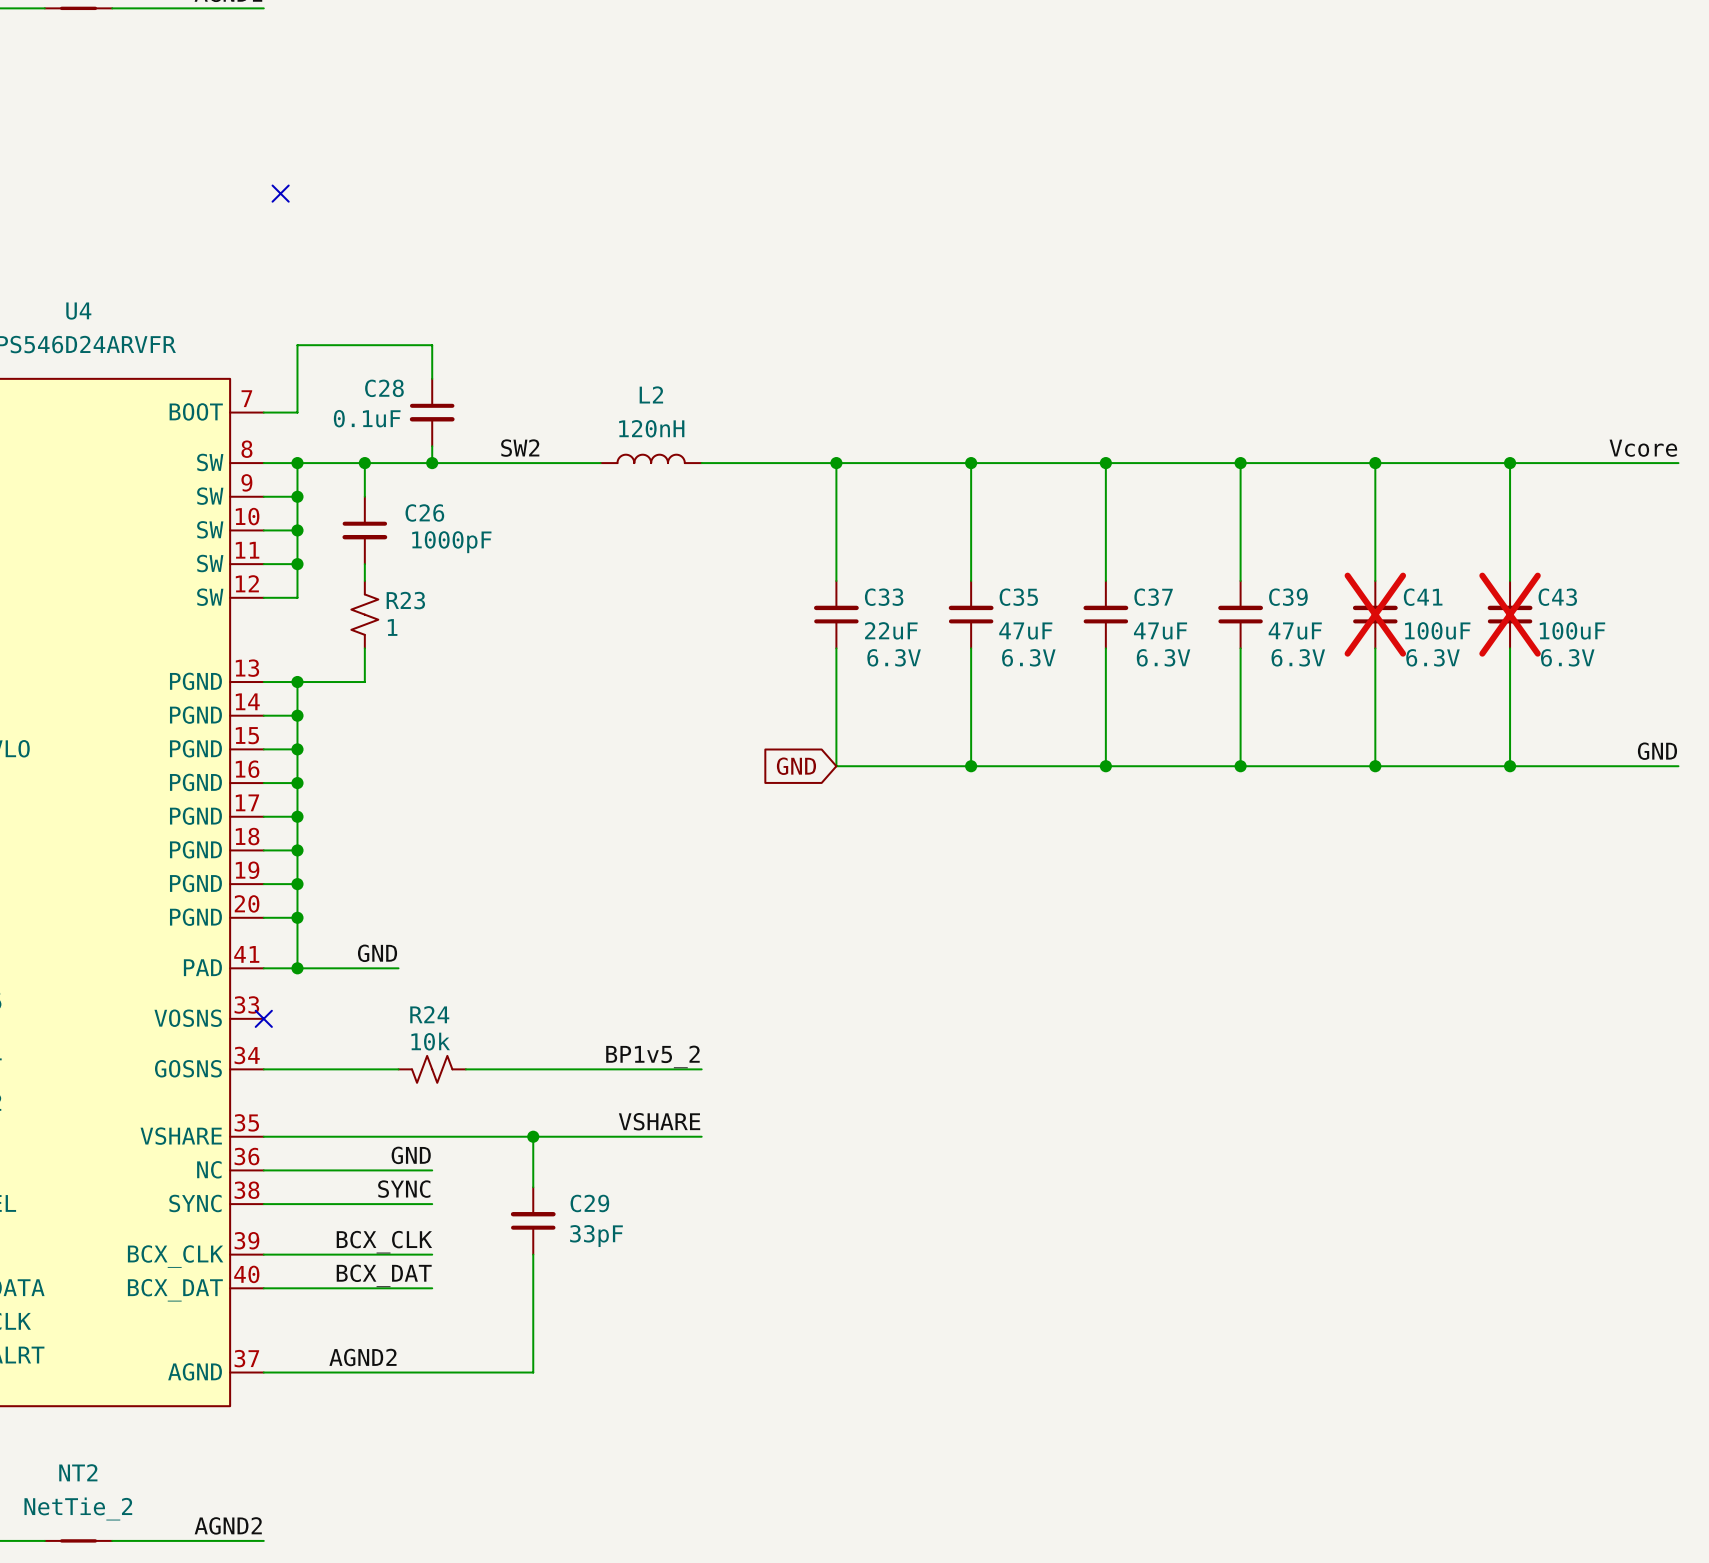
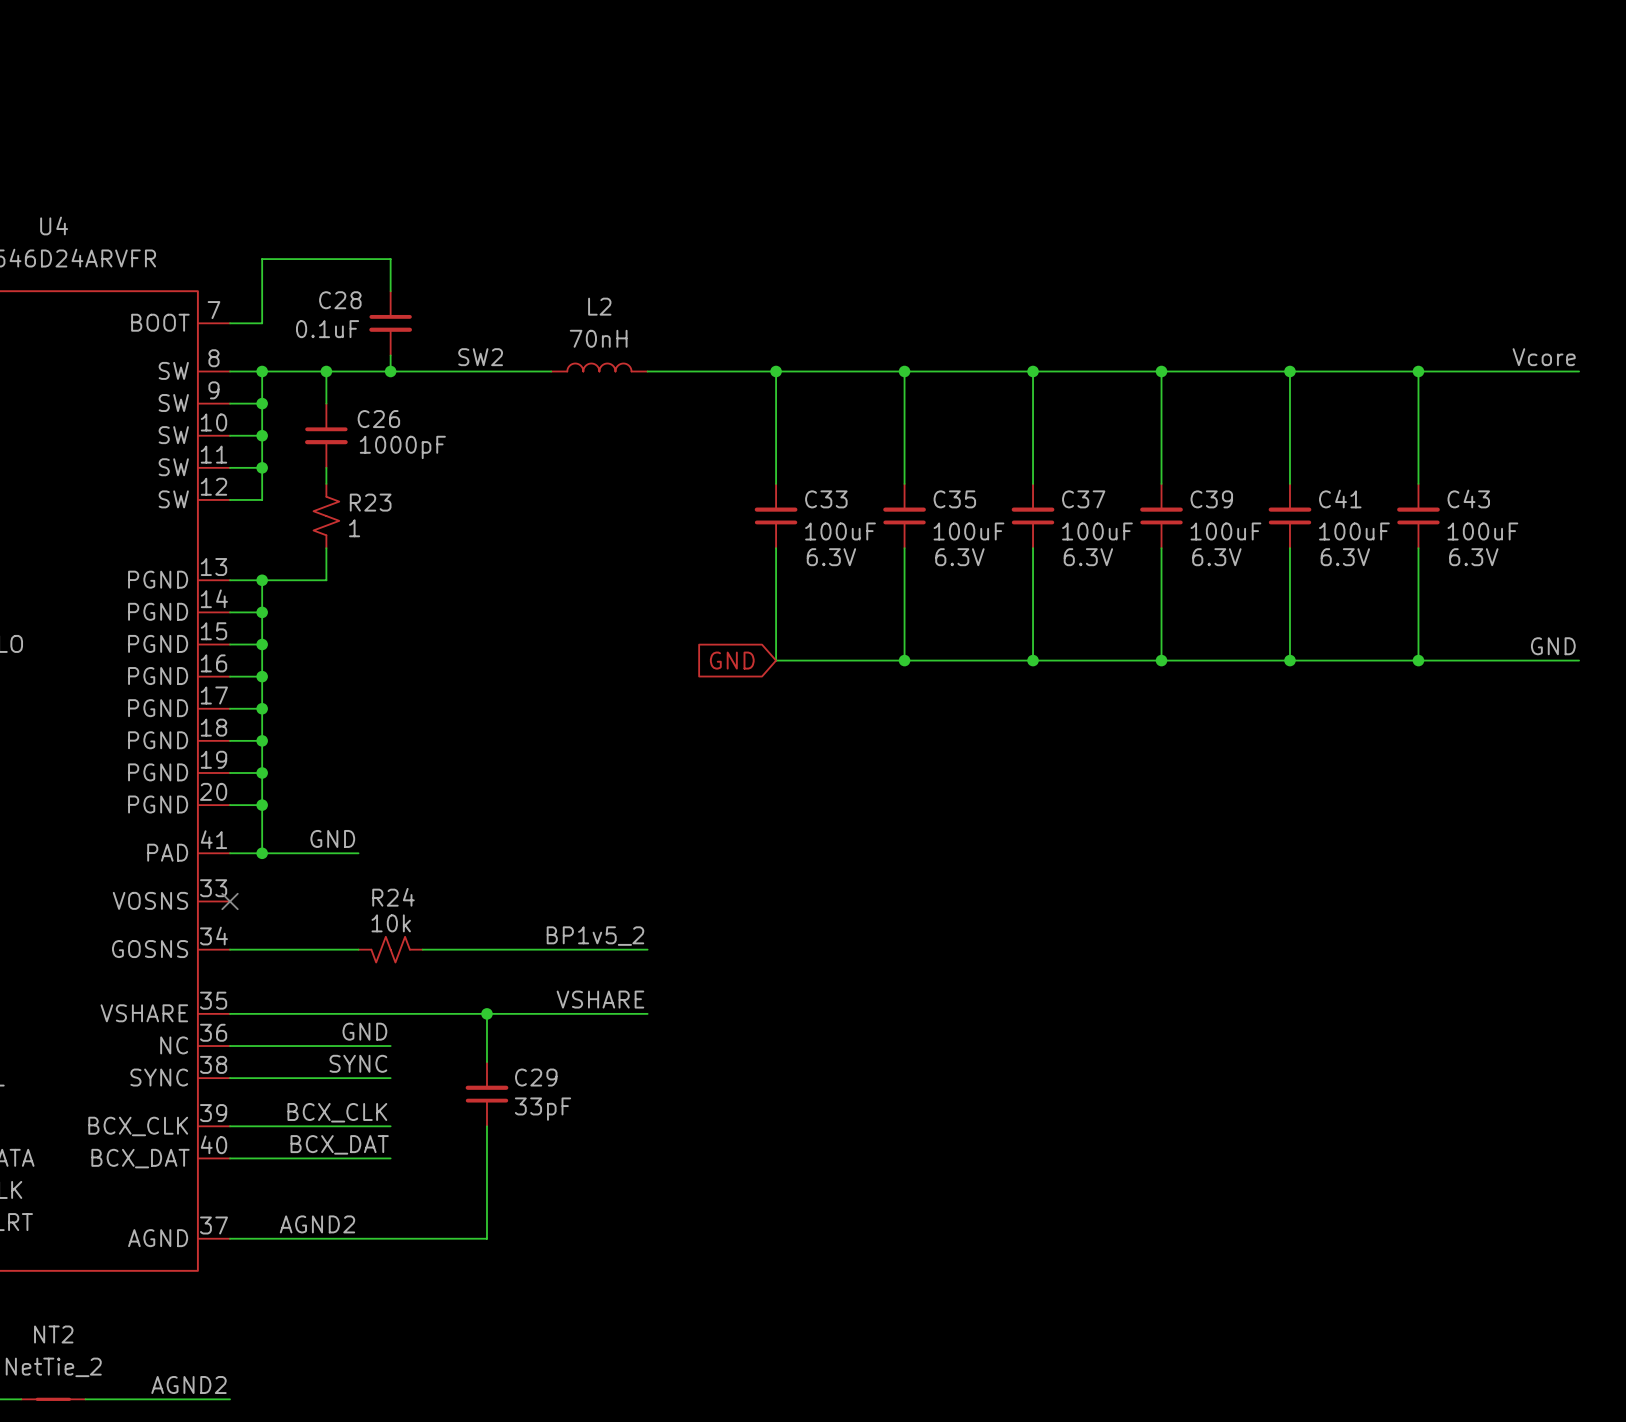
no-connect mark: (280, 193) -> none
L2 value: 120nH (651, 428) -> 70nH (598, 338)
C41 do-not-place cross: (1375, 614) -> none
C43 do-not-place cross: (1510, 614) -> none
C33 value: 22uF (891, 630) -> 100uF (840, 531)
C35 value: 47uF (1025, 631) -> 100uF (968, 531)
C37 value: 47uF (1160, 631) -> 100uF (1097, 531)
C39 value: 47uF (1295, 631) -> 100uF (1225, 531)

